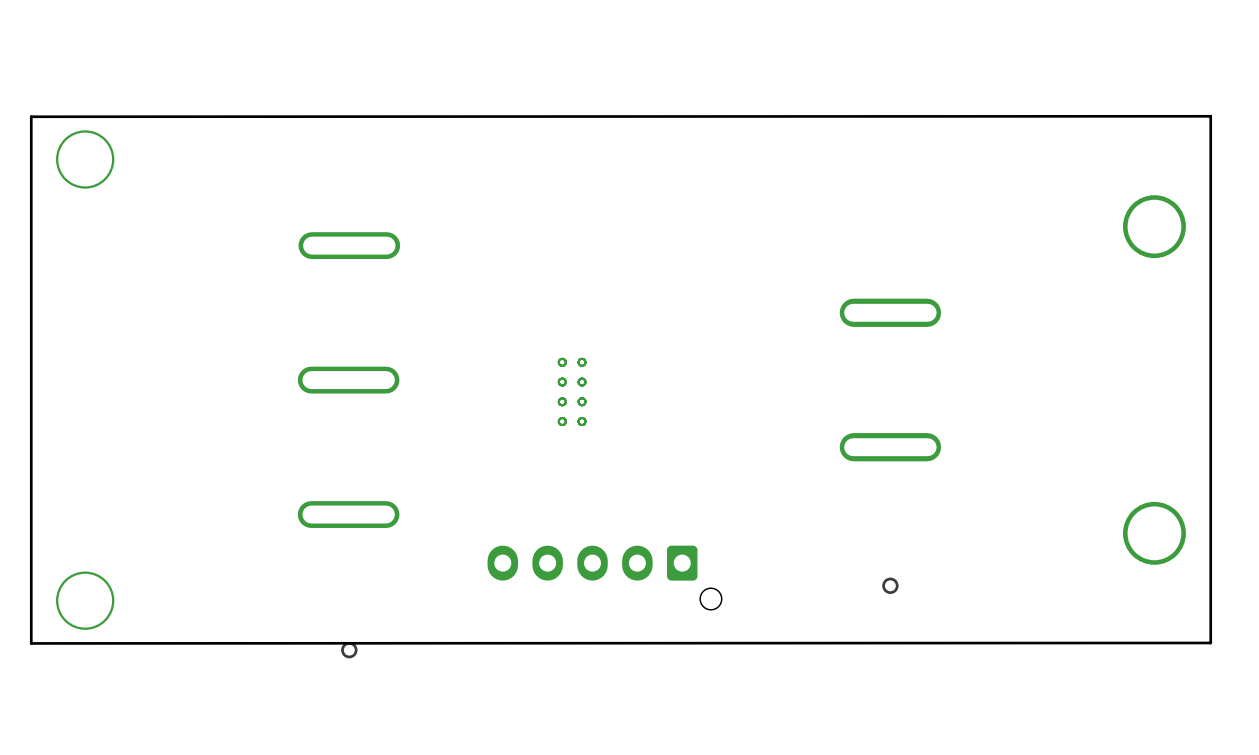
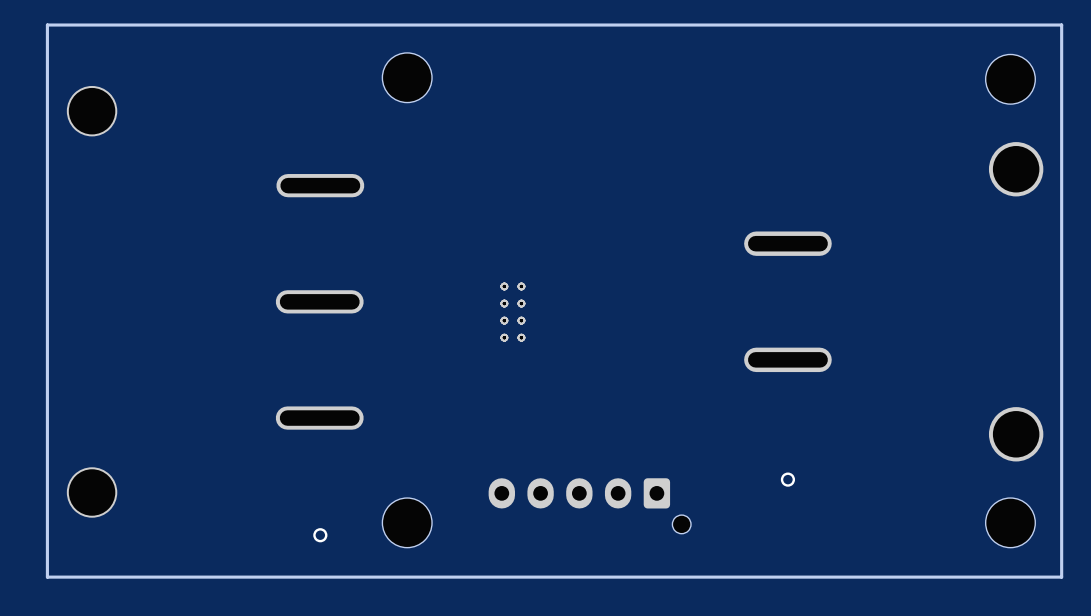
board edge: (1210, 116) (31, 116) (31, 643) (1210, 642) (1210, 116) -> (1061, 25) (1061, 577) (47, 577) (47, 25) (1061, 25)
part: none -> (407, 77)
part: none -> (1010, 79)
part position: (604, 577) -> (589, 505)
part: none -> (407, 522)
part: none -> (1010, 522)

